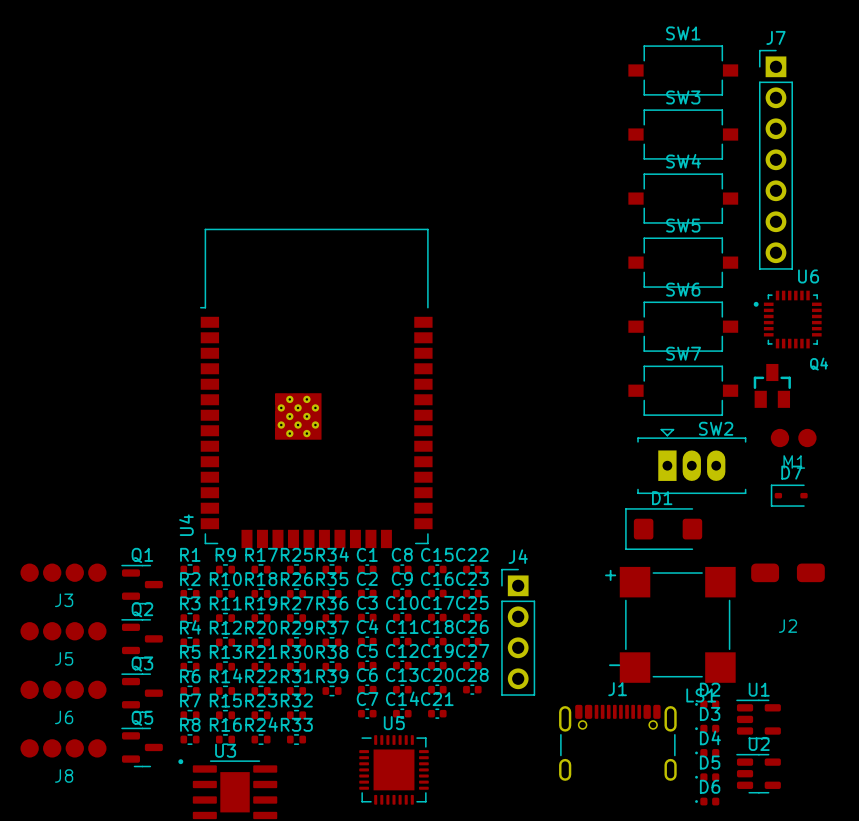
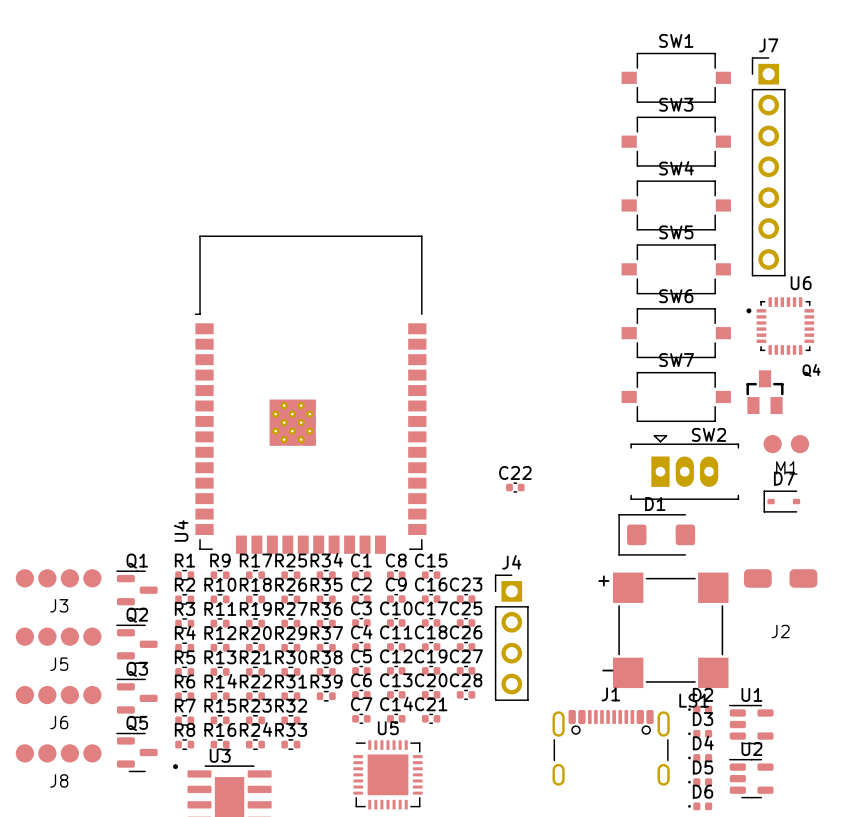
C22 position: (472, 569) -> (515, 487)

